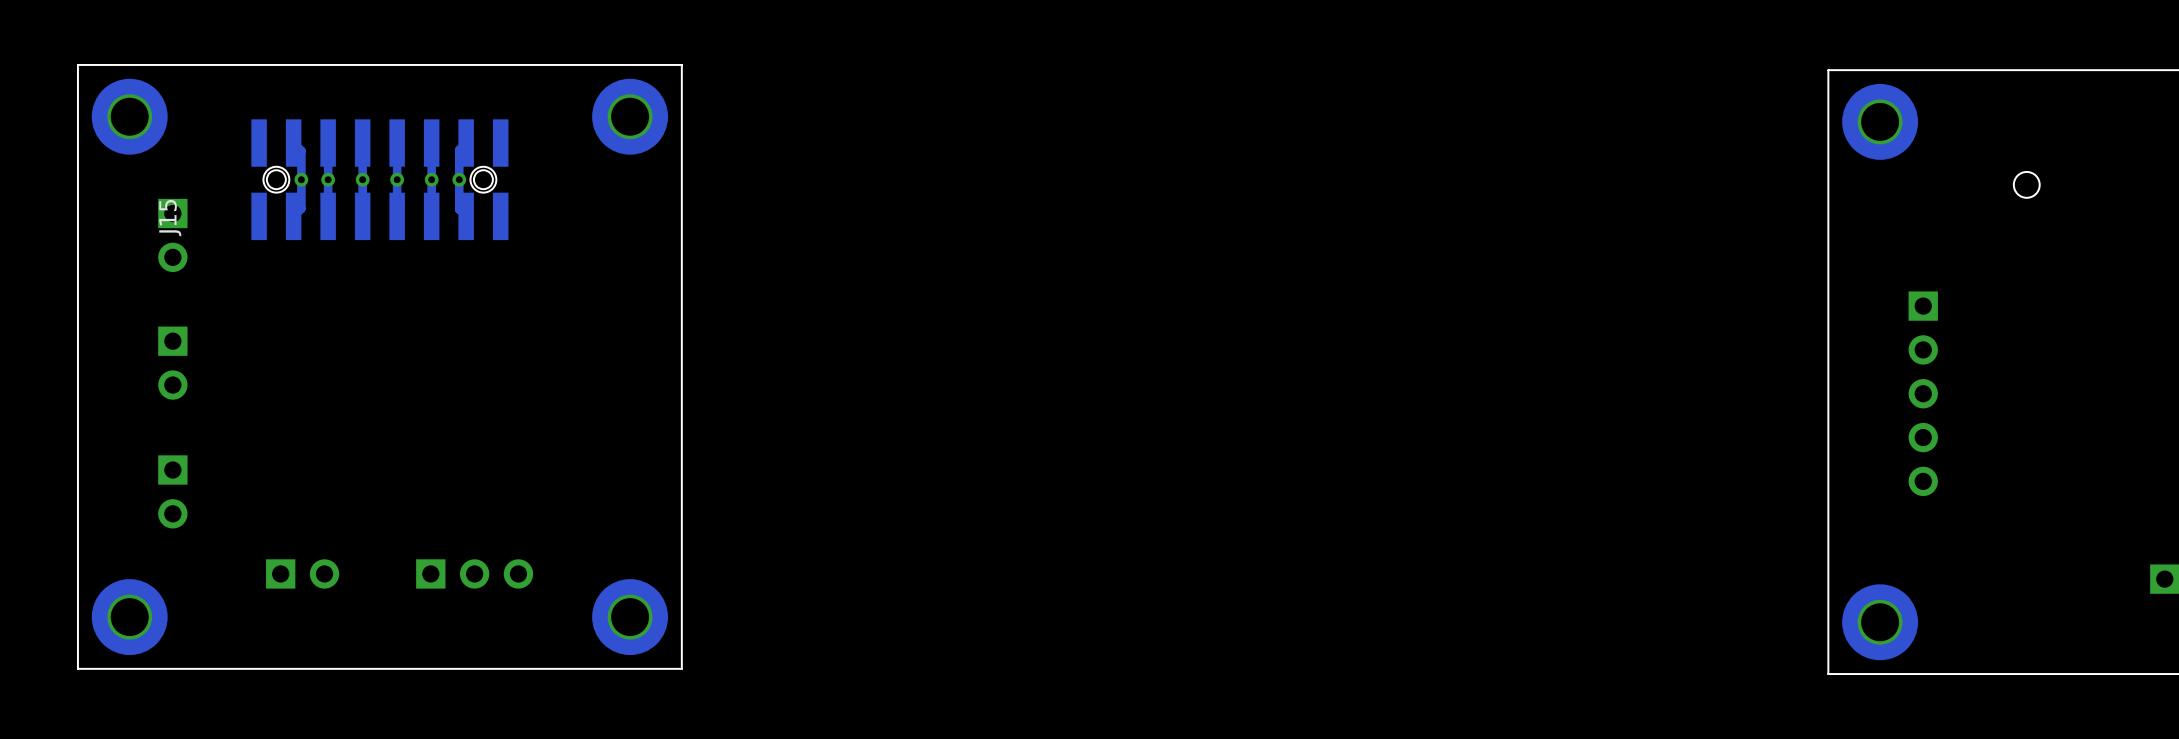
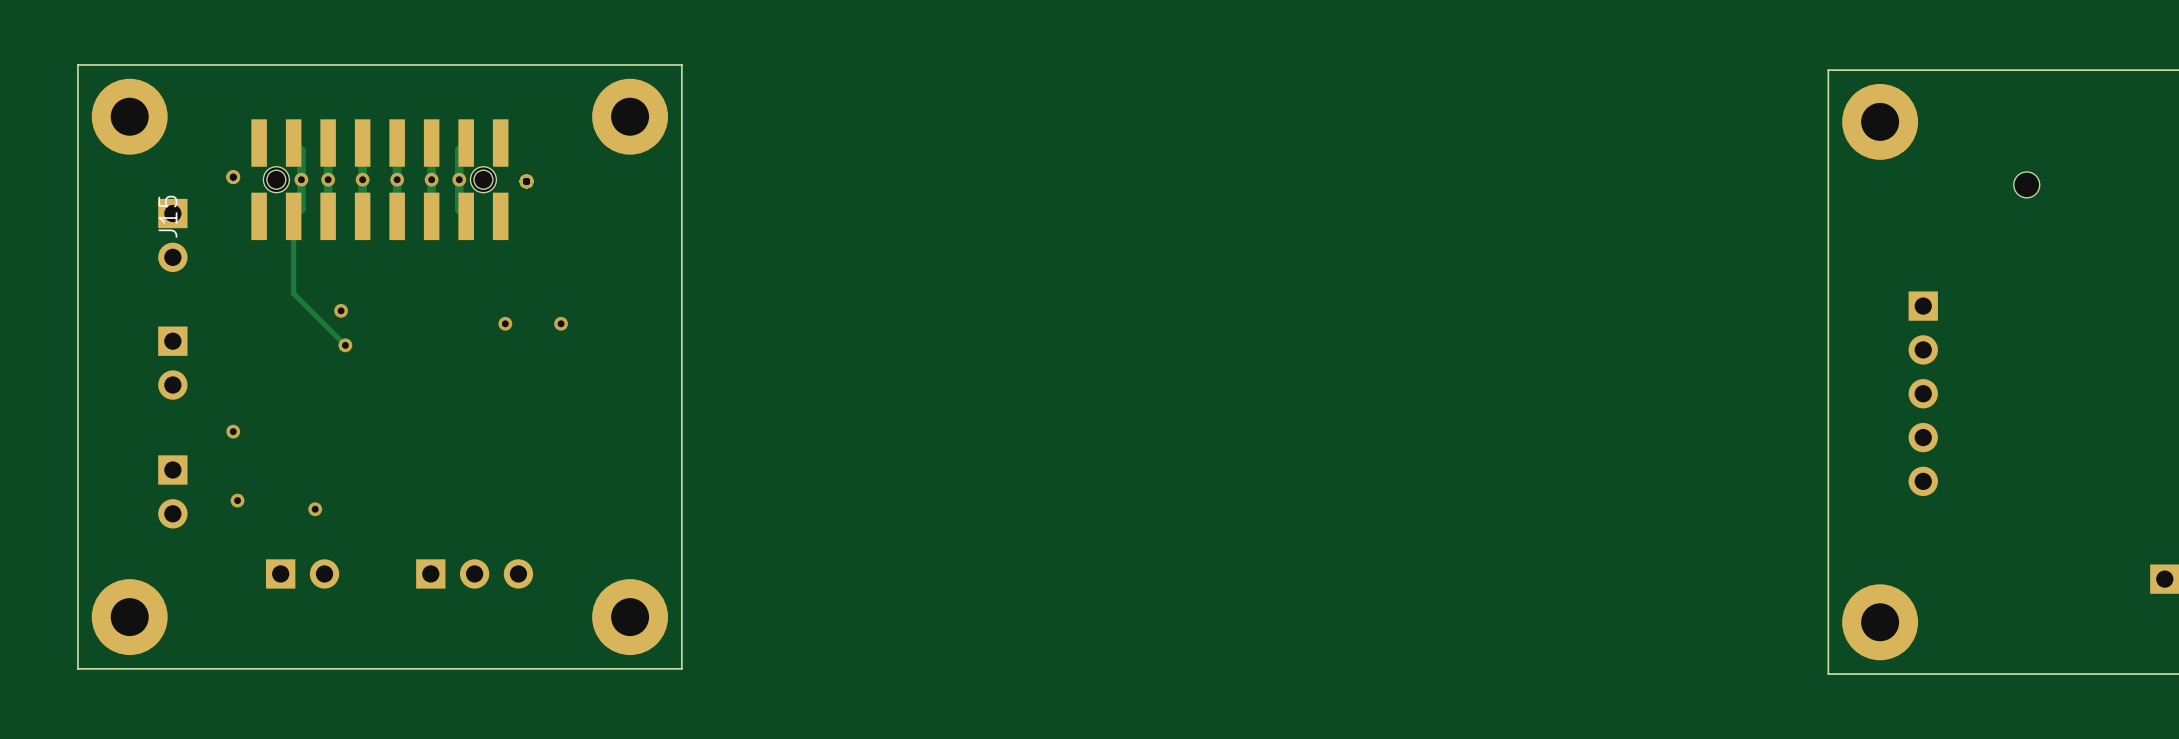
via: none -> (233, 177)
via: none -> (526, 181)
track: none -> (293, 216) (293, 293) (345, 345)
via: none -> (341, 310)
via: none -> (505, 323)
via: none -> (561, 323)
via: none -> (345, 345)
via: none -> (233, 431)
via: none -> (237, 500)
via: none -> (315, 509)

